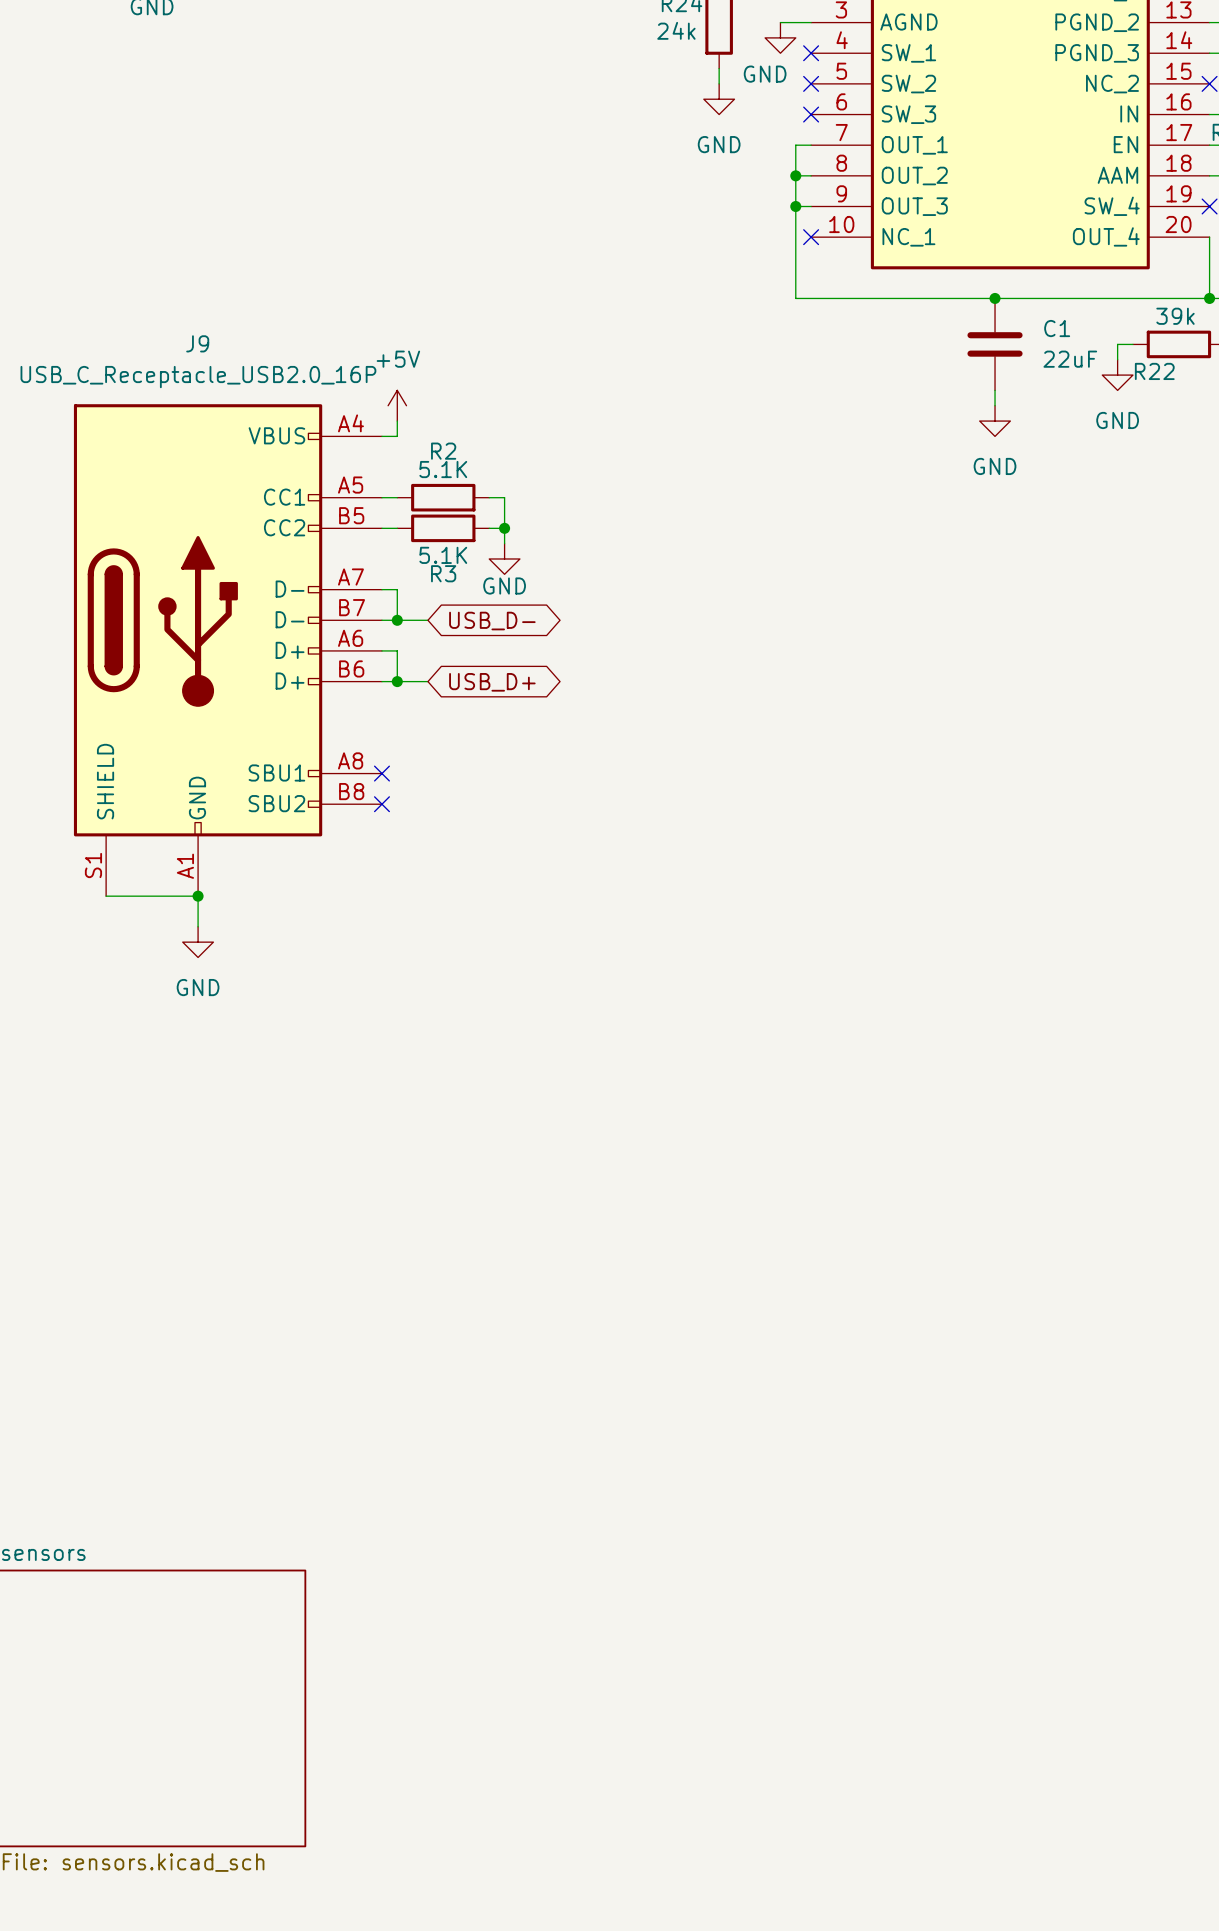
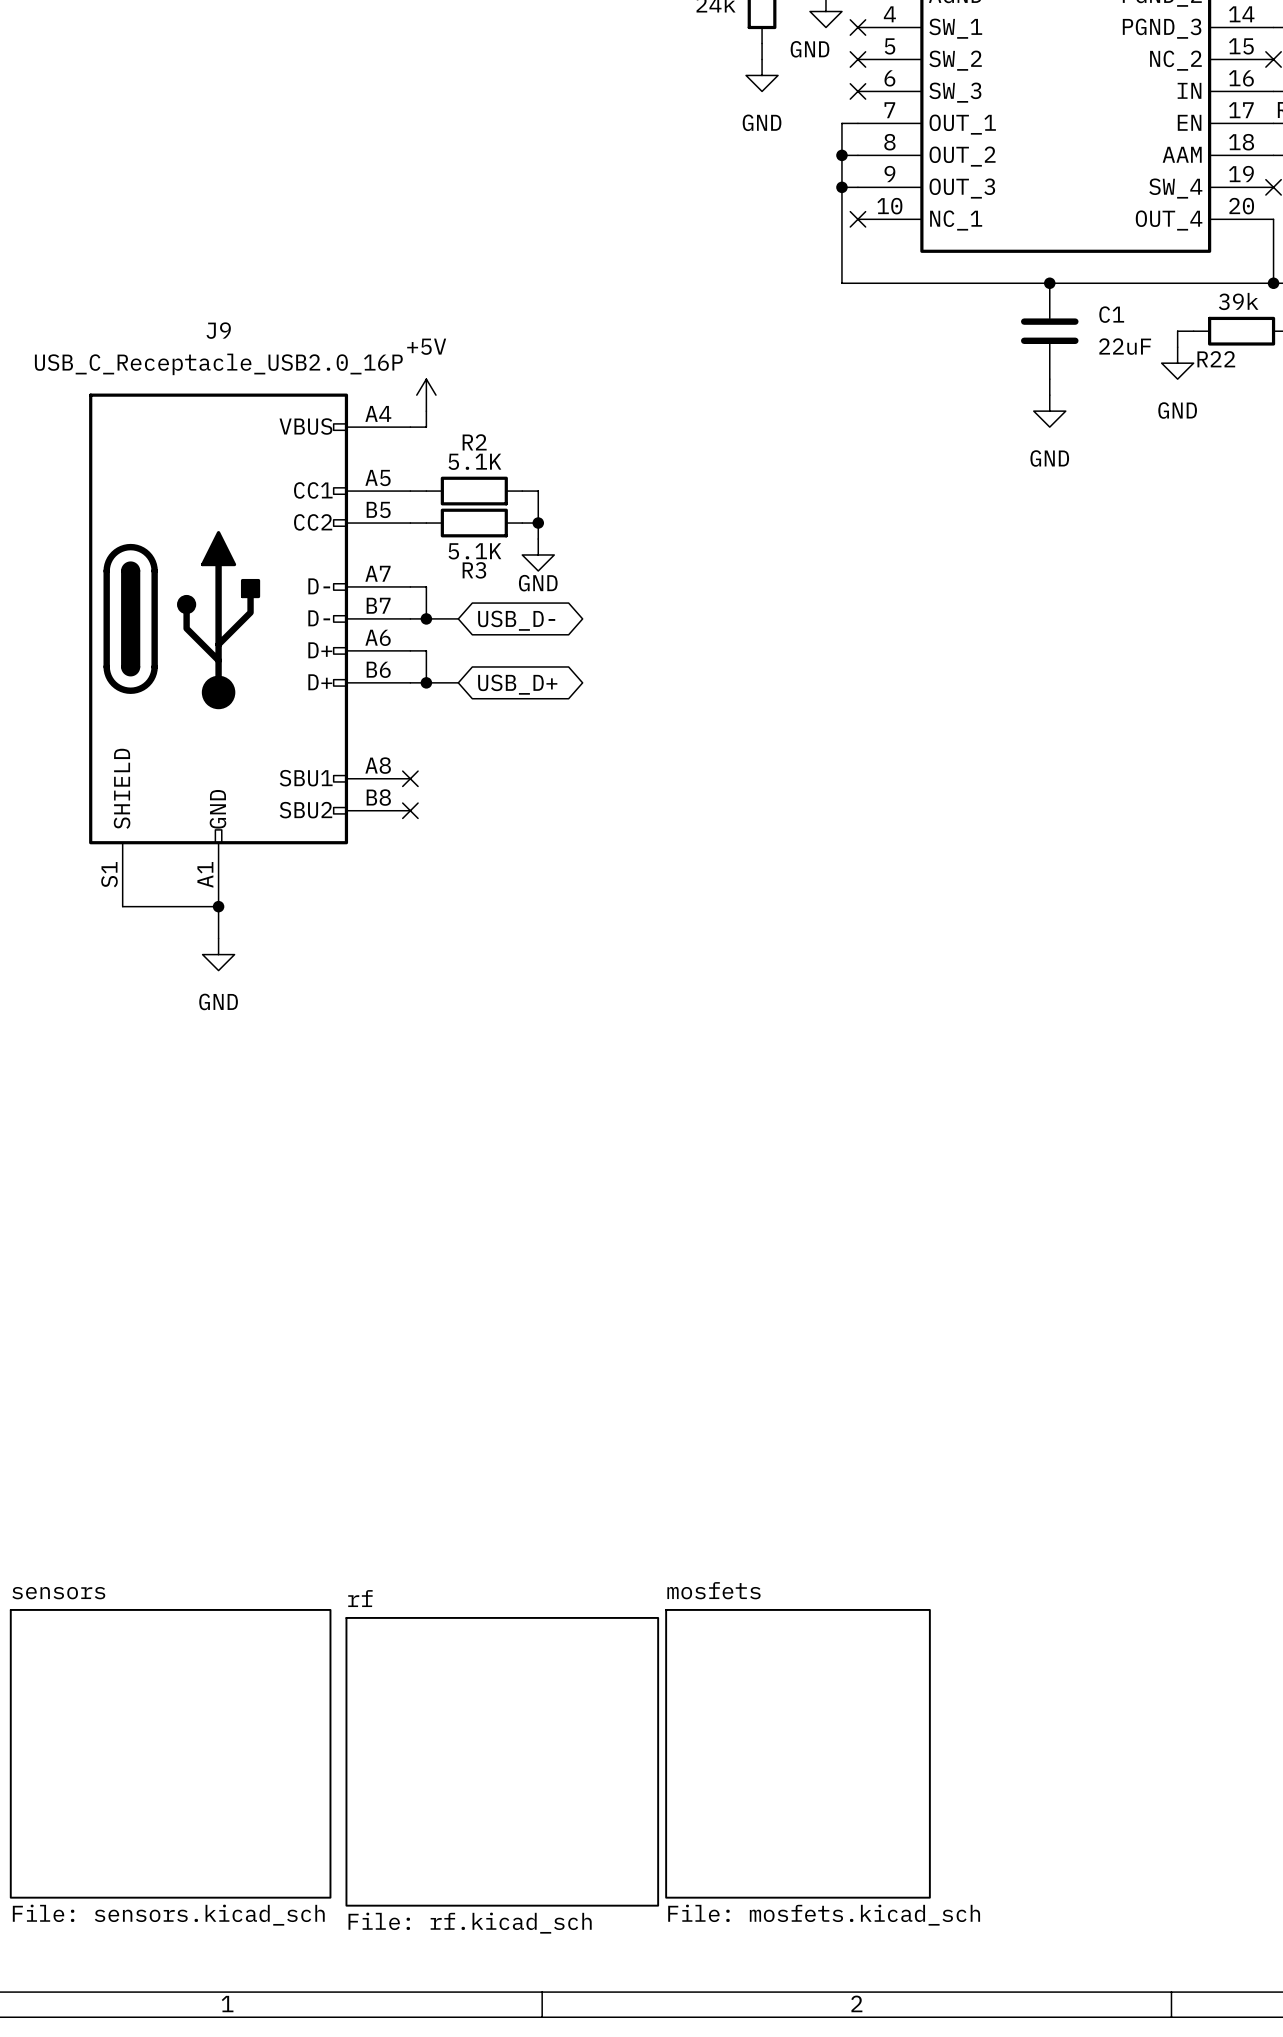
sheet mosfets: none -> File: mosfets.kicad_sch (798, 1753)
sheet rf: none -> File: rf.kicad_sch (502, 1761)

